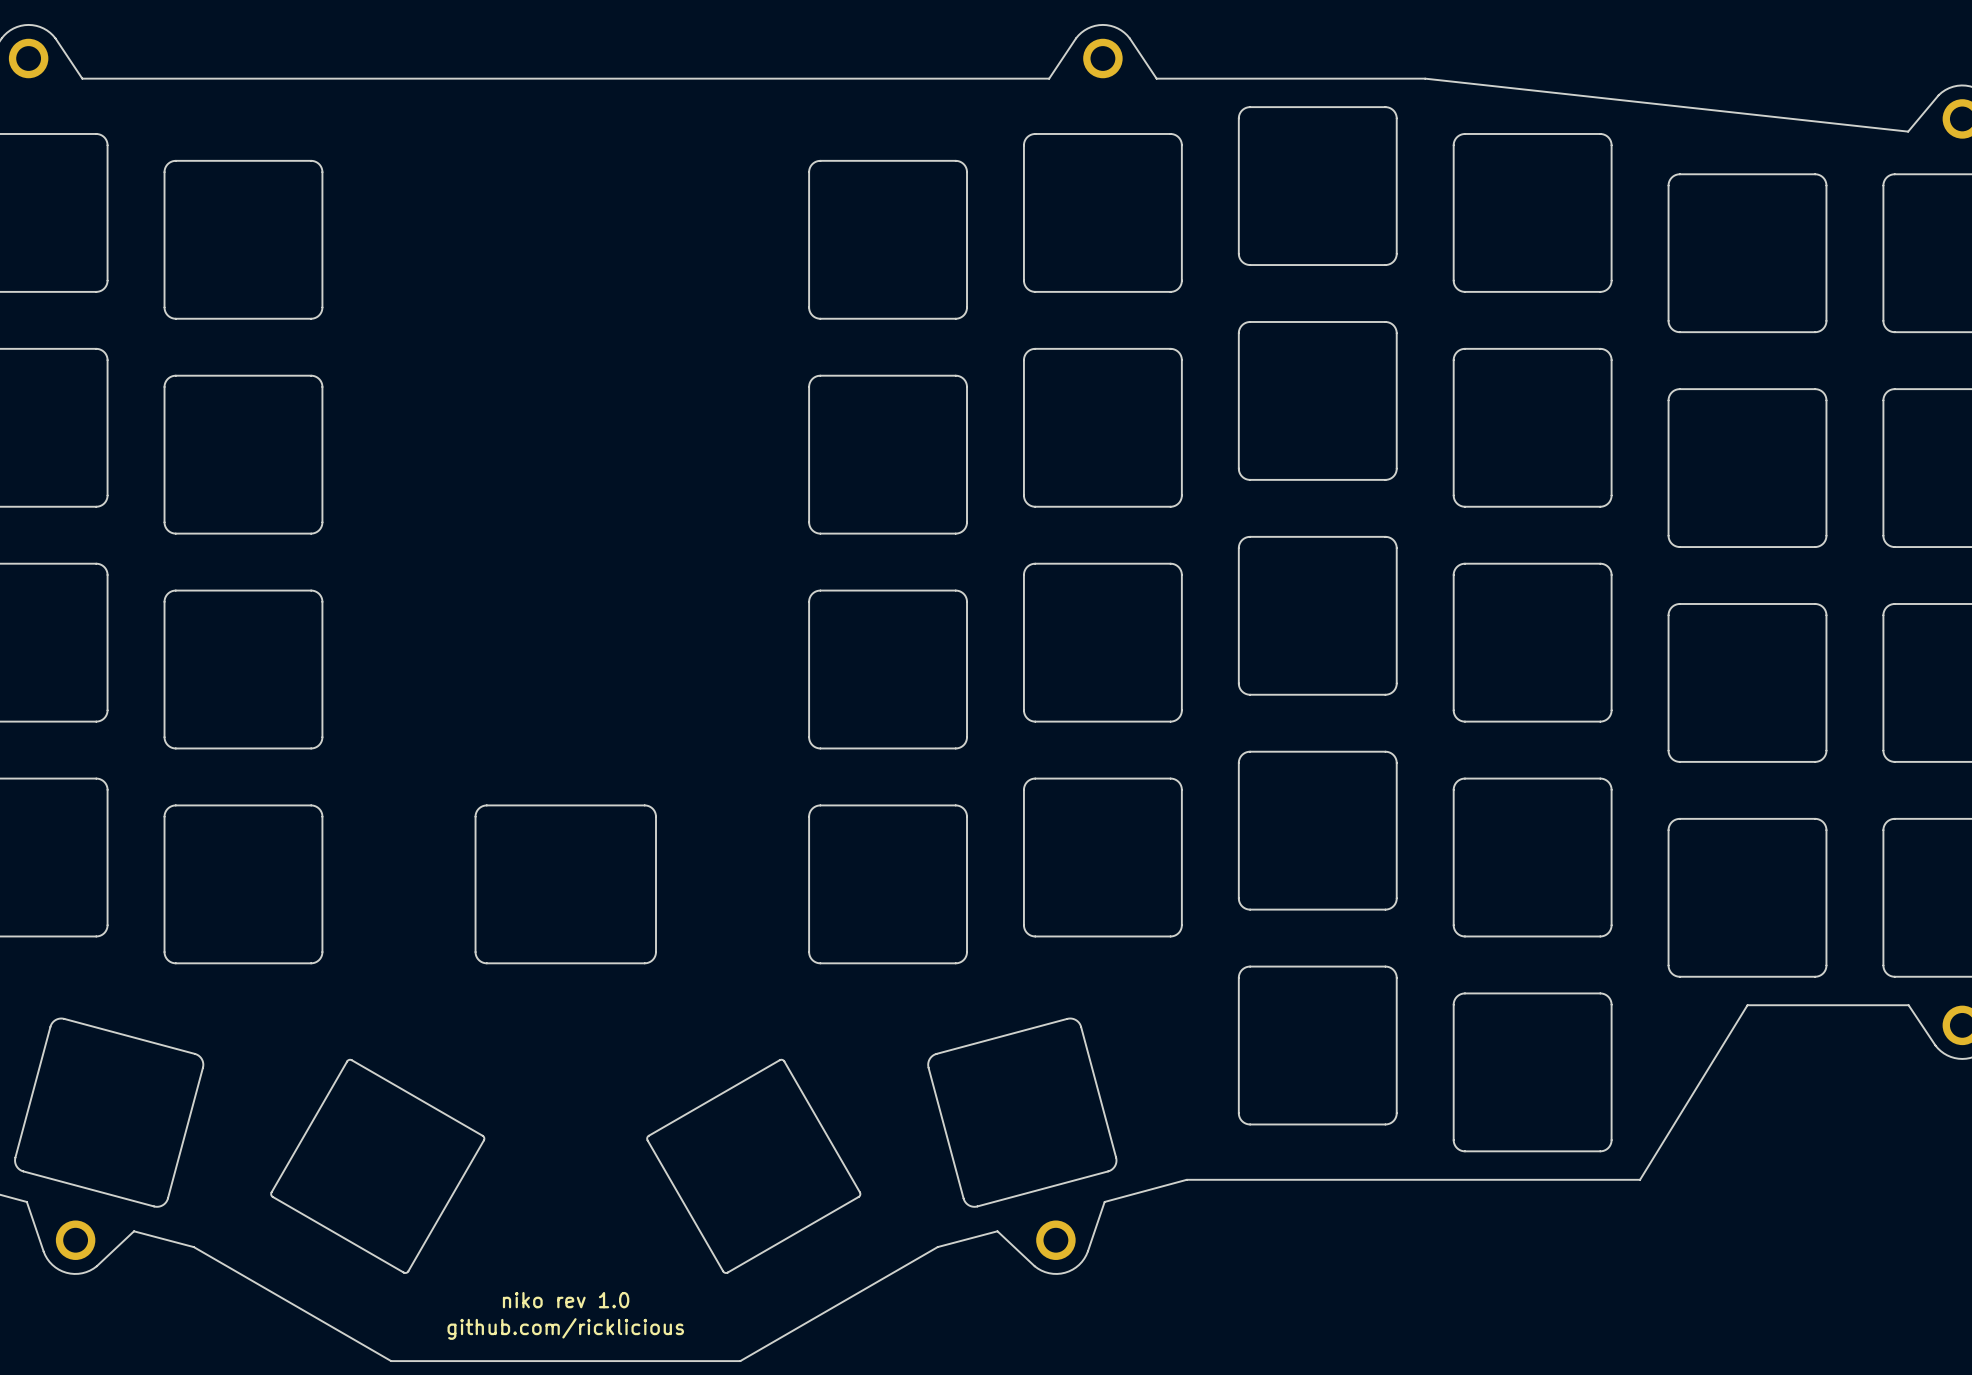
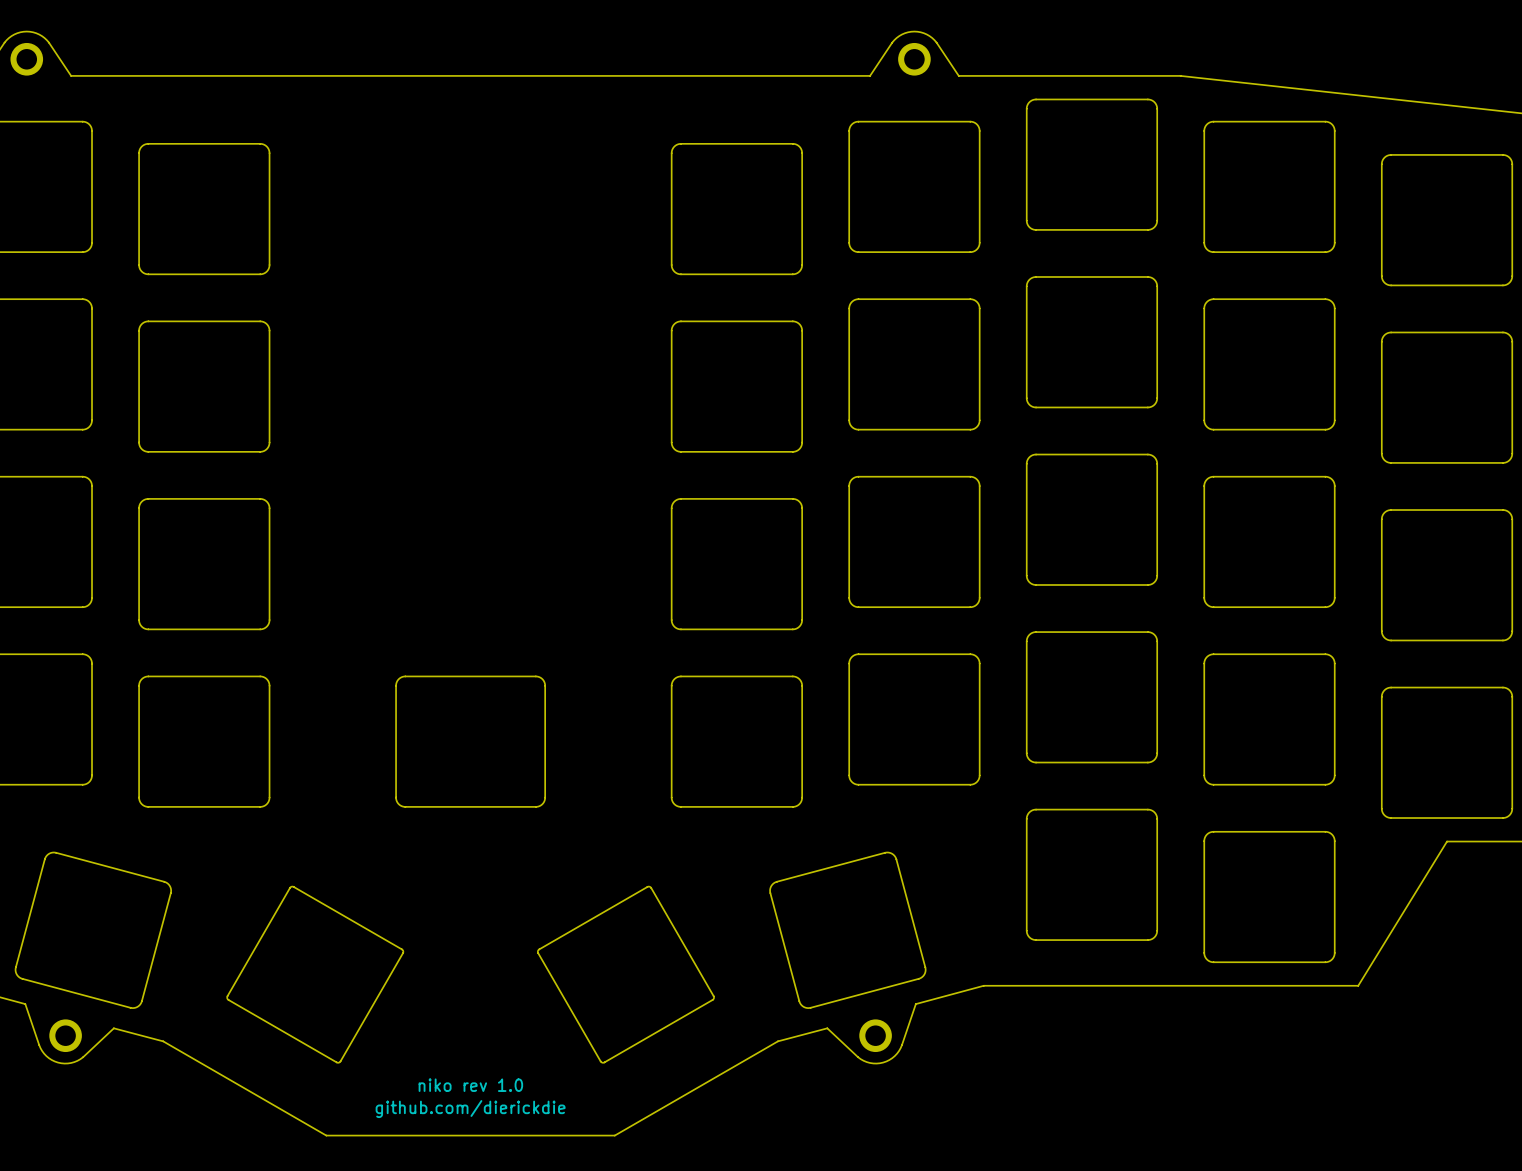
text: github.com/ricklicious (565, 1329) -> github.com/dierickdie (470, 1109)

